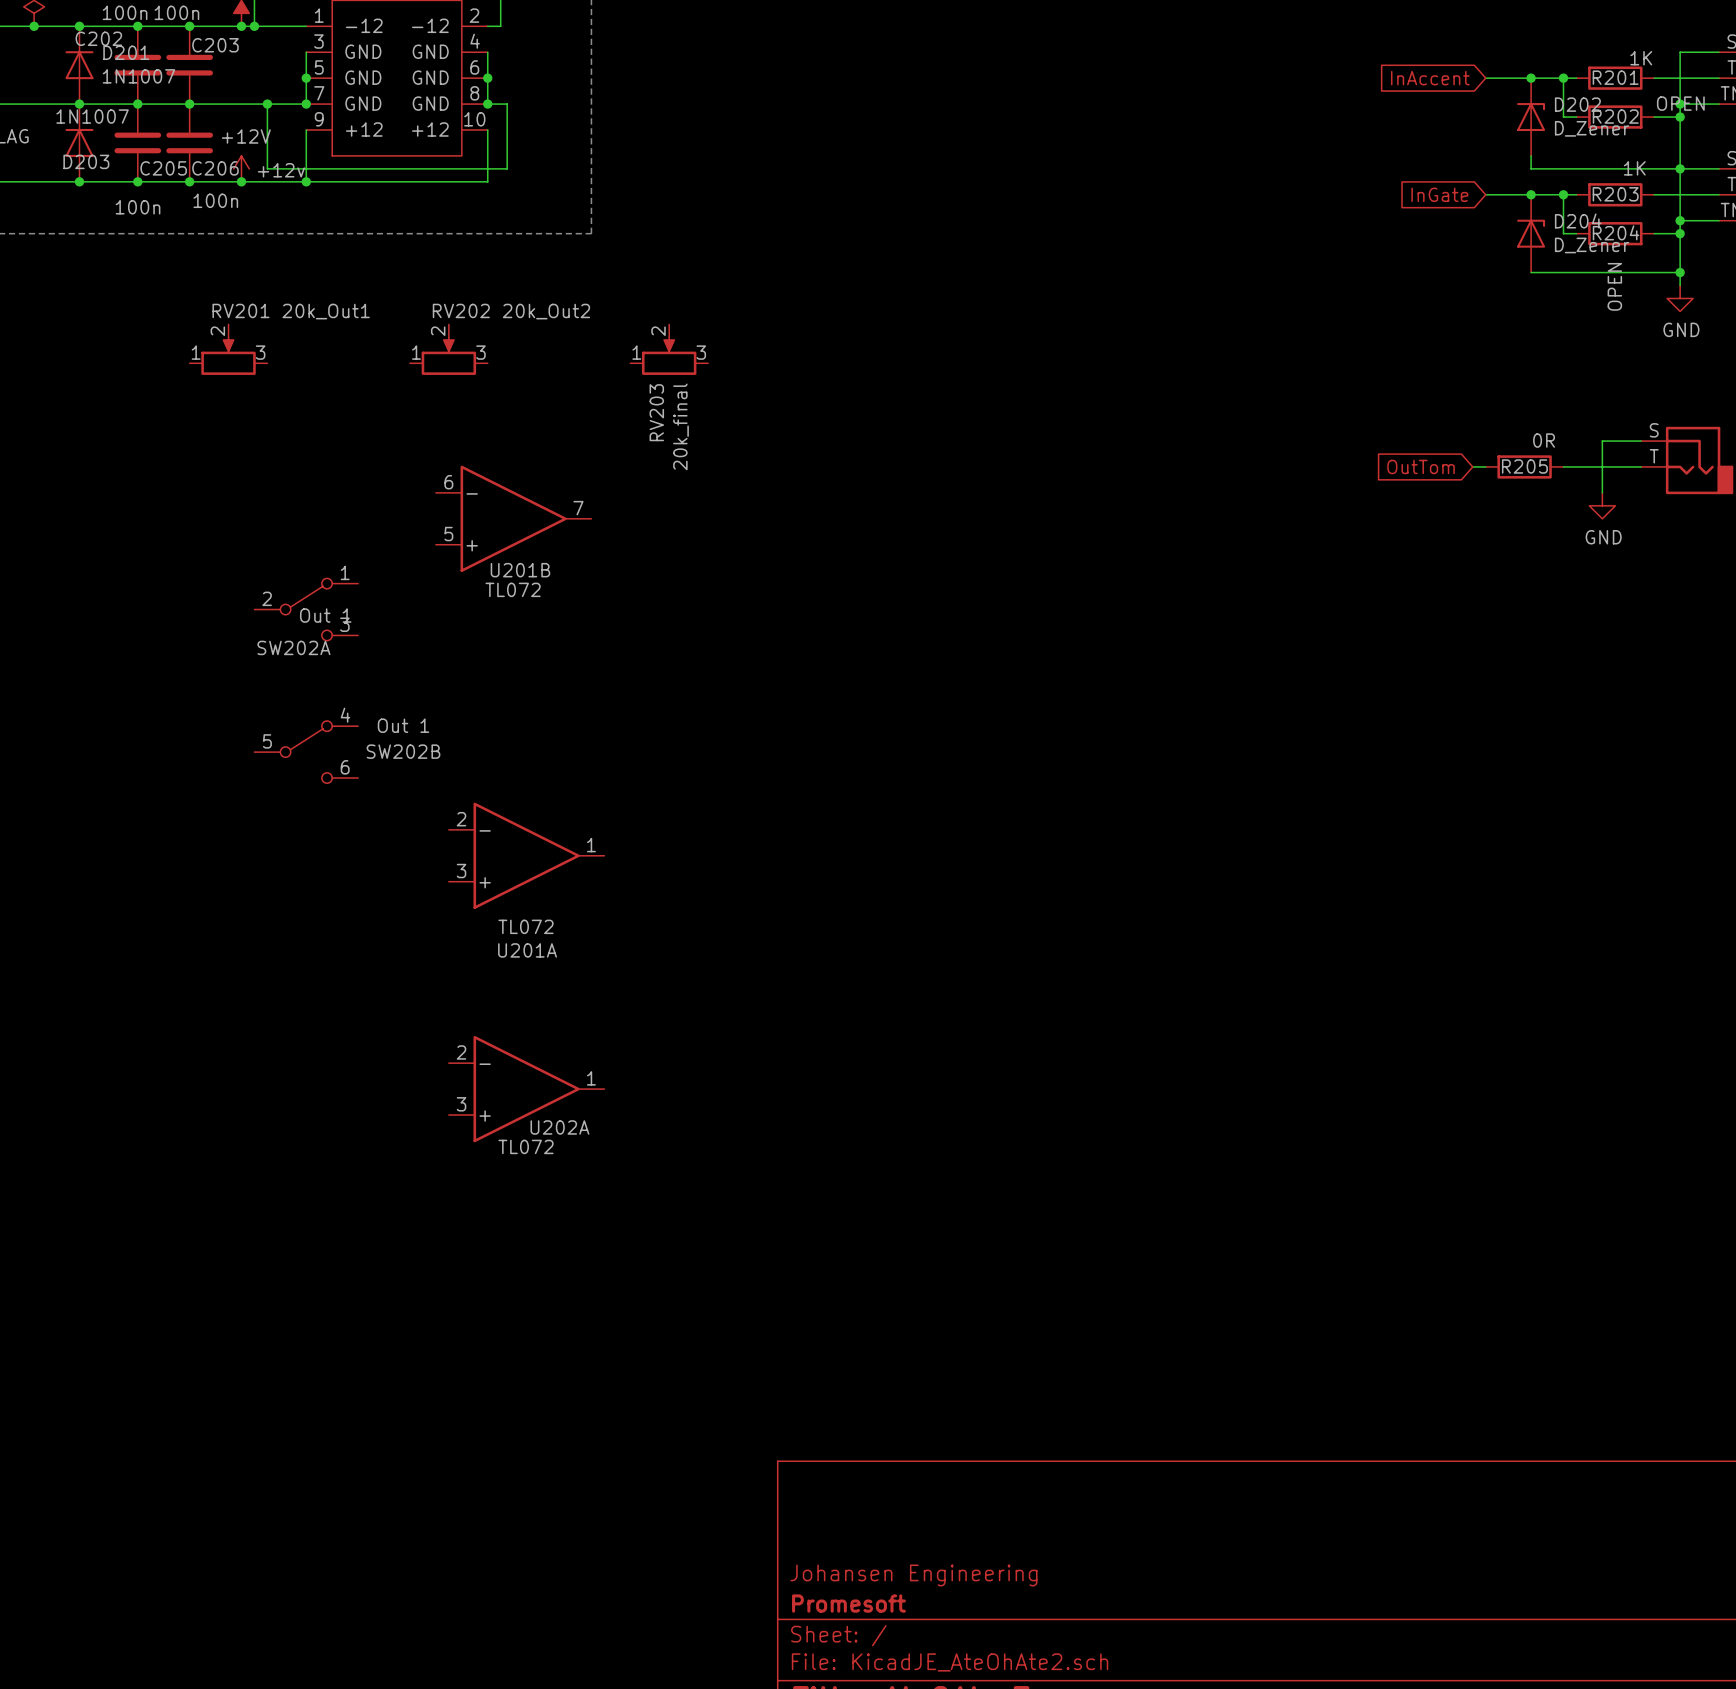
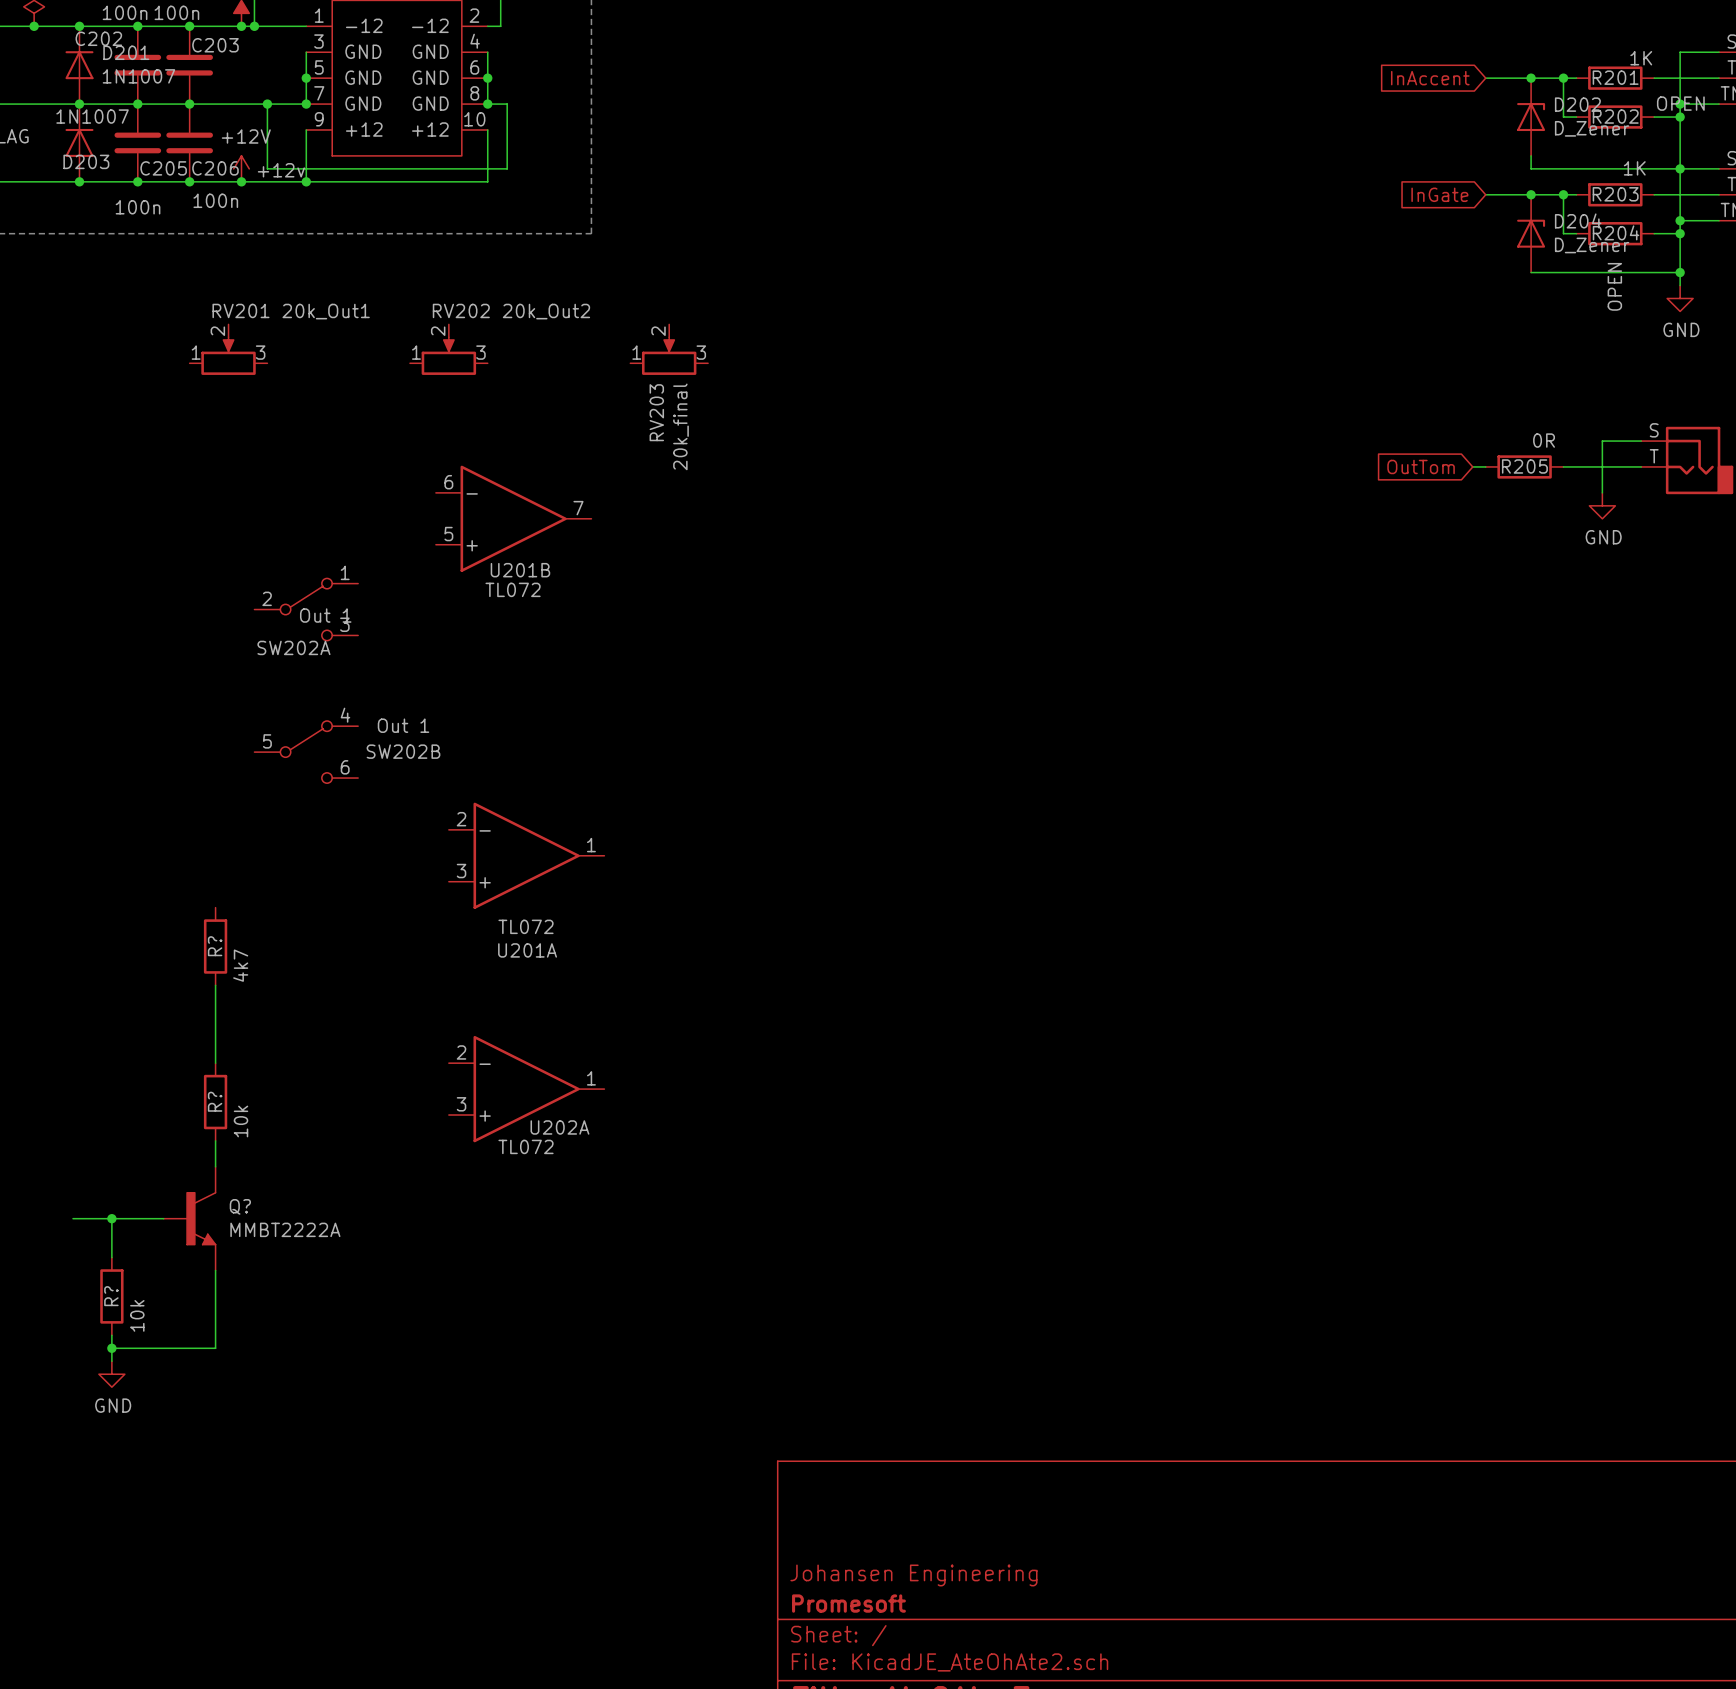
R?: none -> 4k7 (215, 946)
wire: none -> (215, 985) (215, 1063)
R?: none -> 10k (215, 1102)
wire: none -> (215, 1140) (215, 1166)
wire: none -> (73, 1218) (163, 1218)
wire: none -> (111, 1218) (111, 1257)
junction: none -> (111, 1218)
Q?: none -> MMBT2222A (190, 1218)
wire: none -> (215, 1270) (215, 1348) (111, 1348)
R?: none -> 10k (111, 1296)
wire: none -> (111, 1335) (111, 1361)
junction: none -> (111, 1348)
power symbol: none -> GND (111, 1374)

